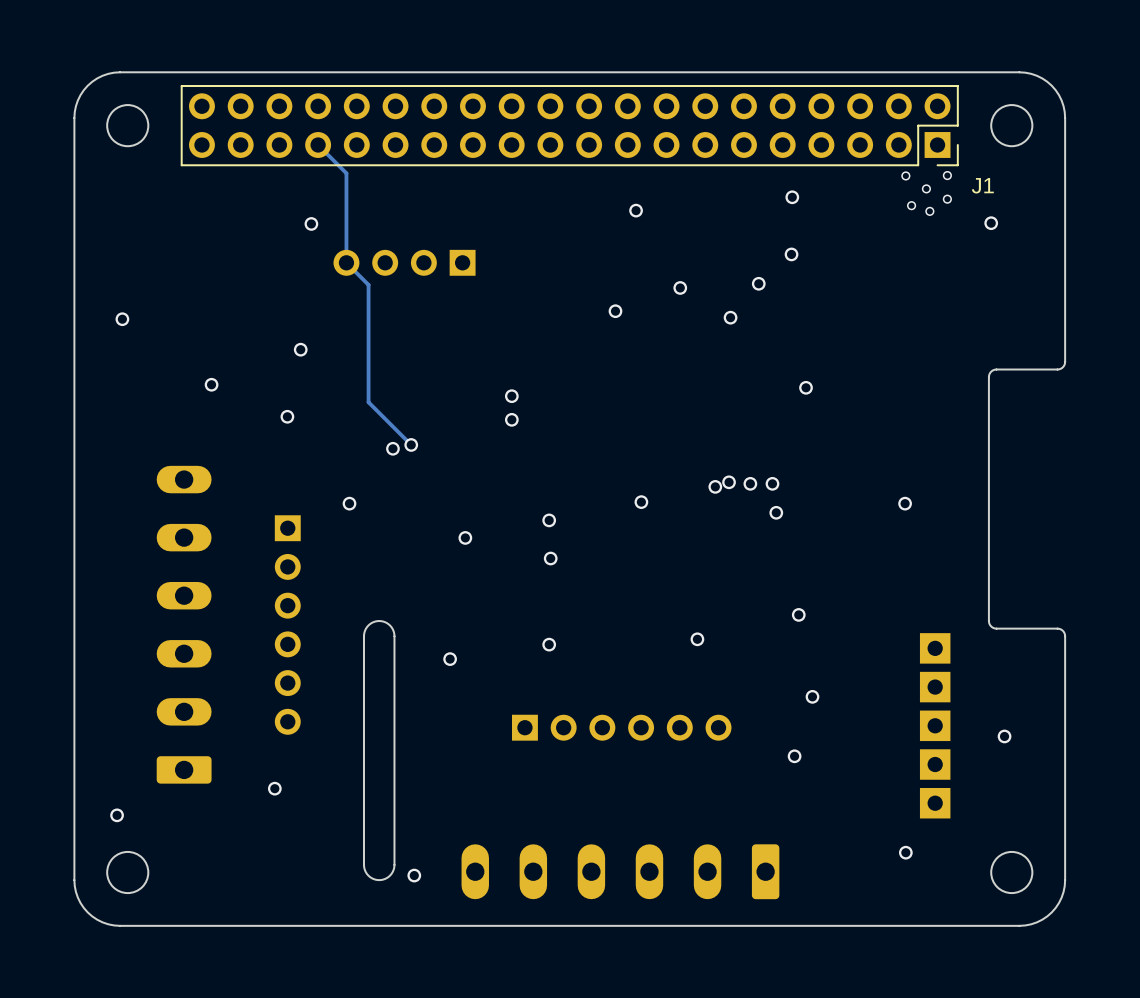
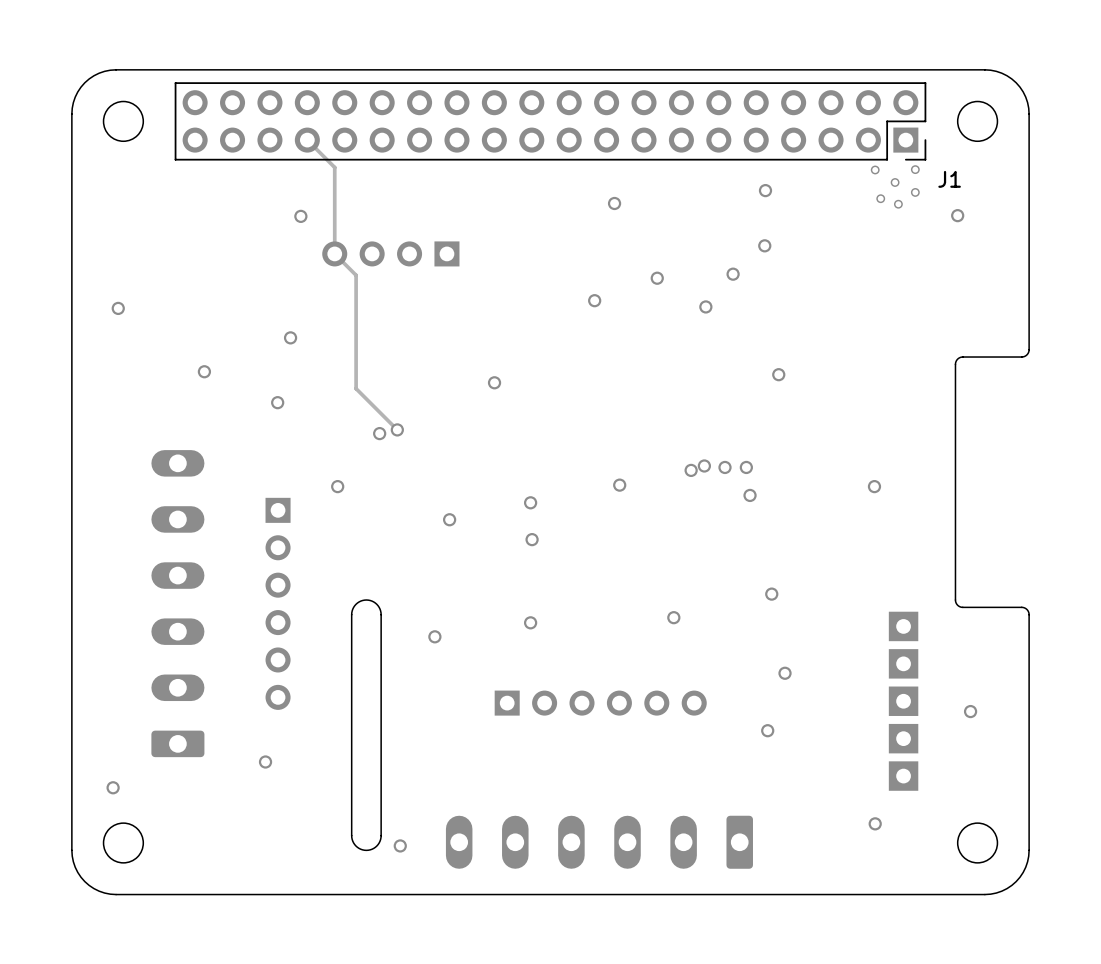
via: (511, 419) -> none

